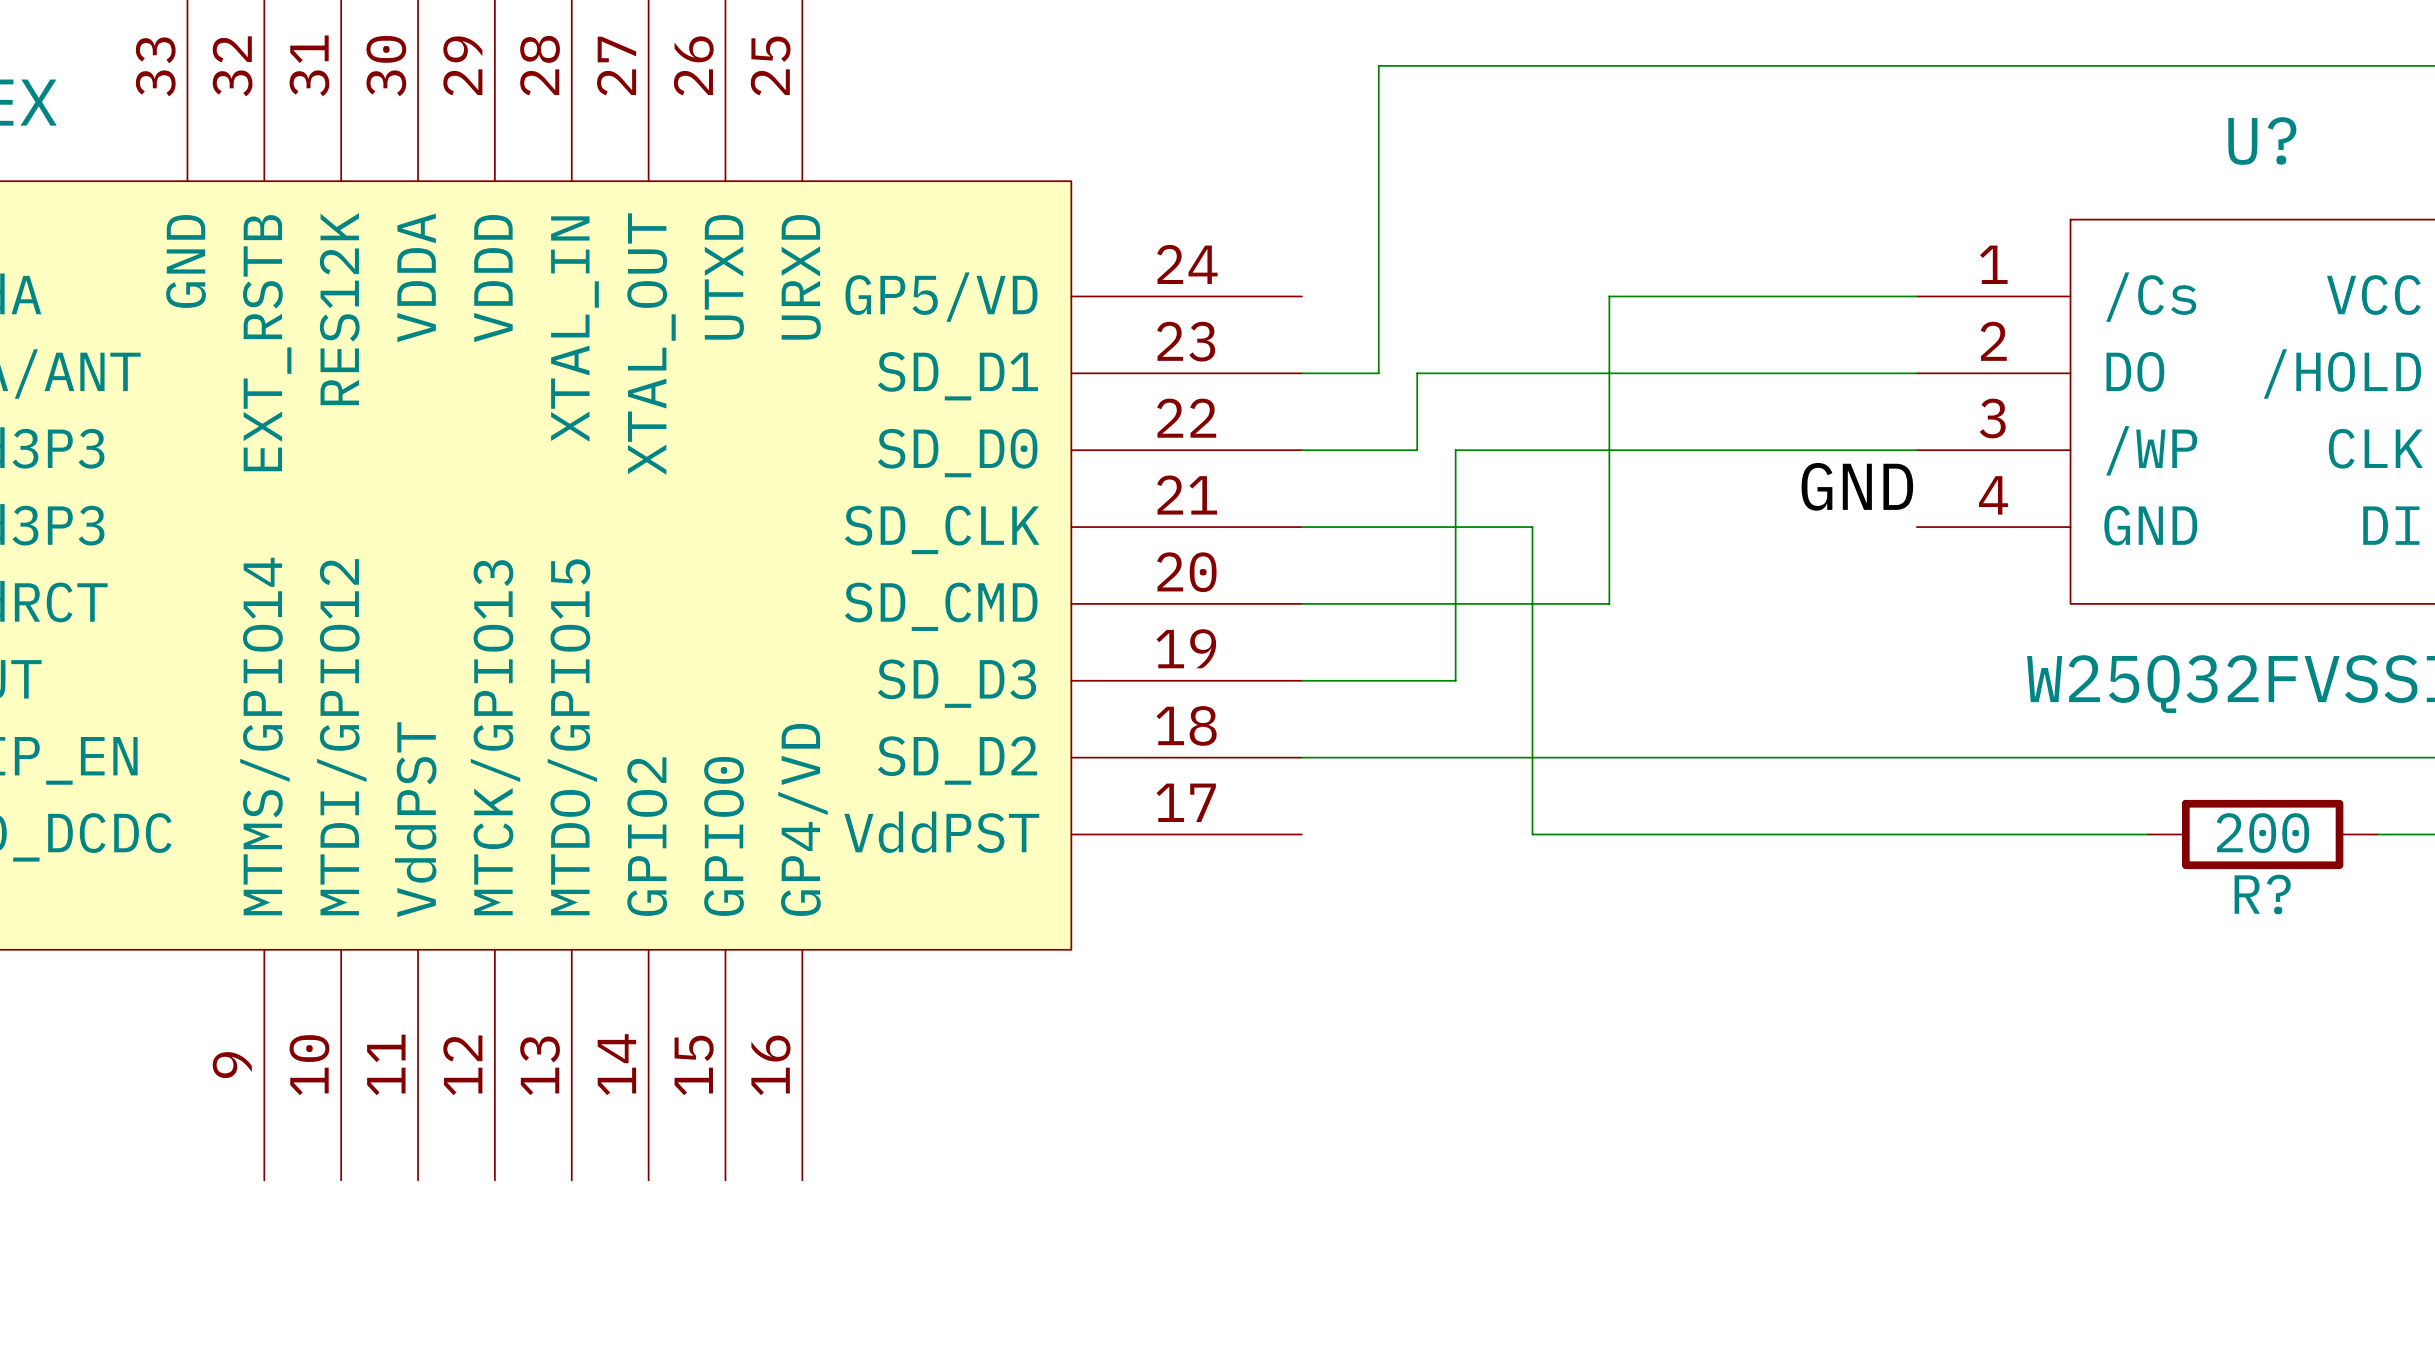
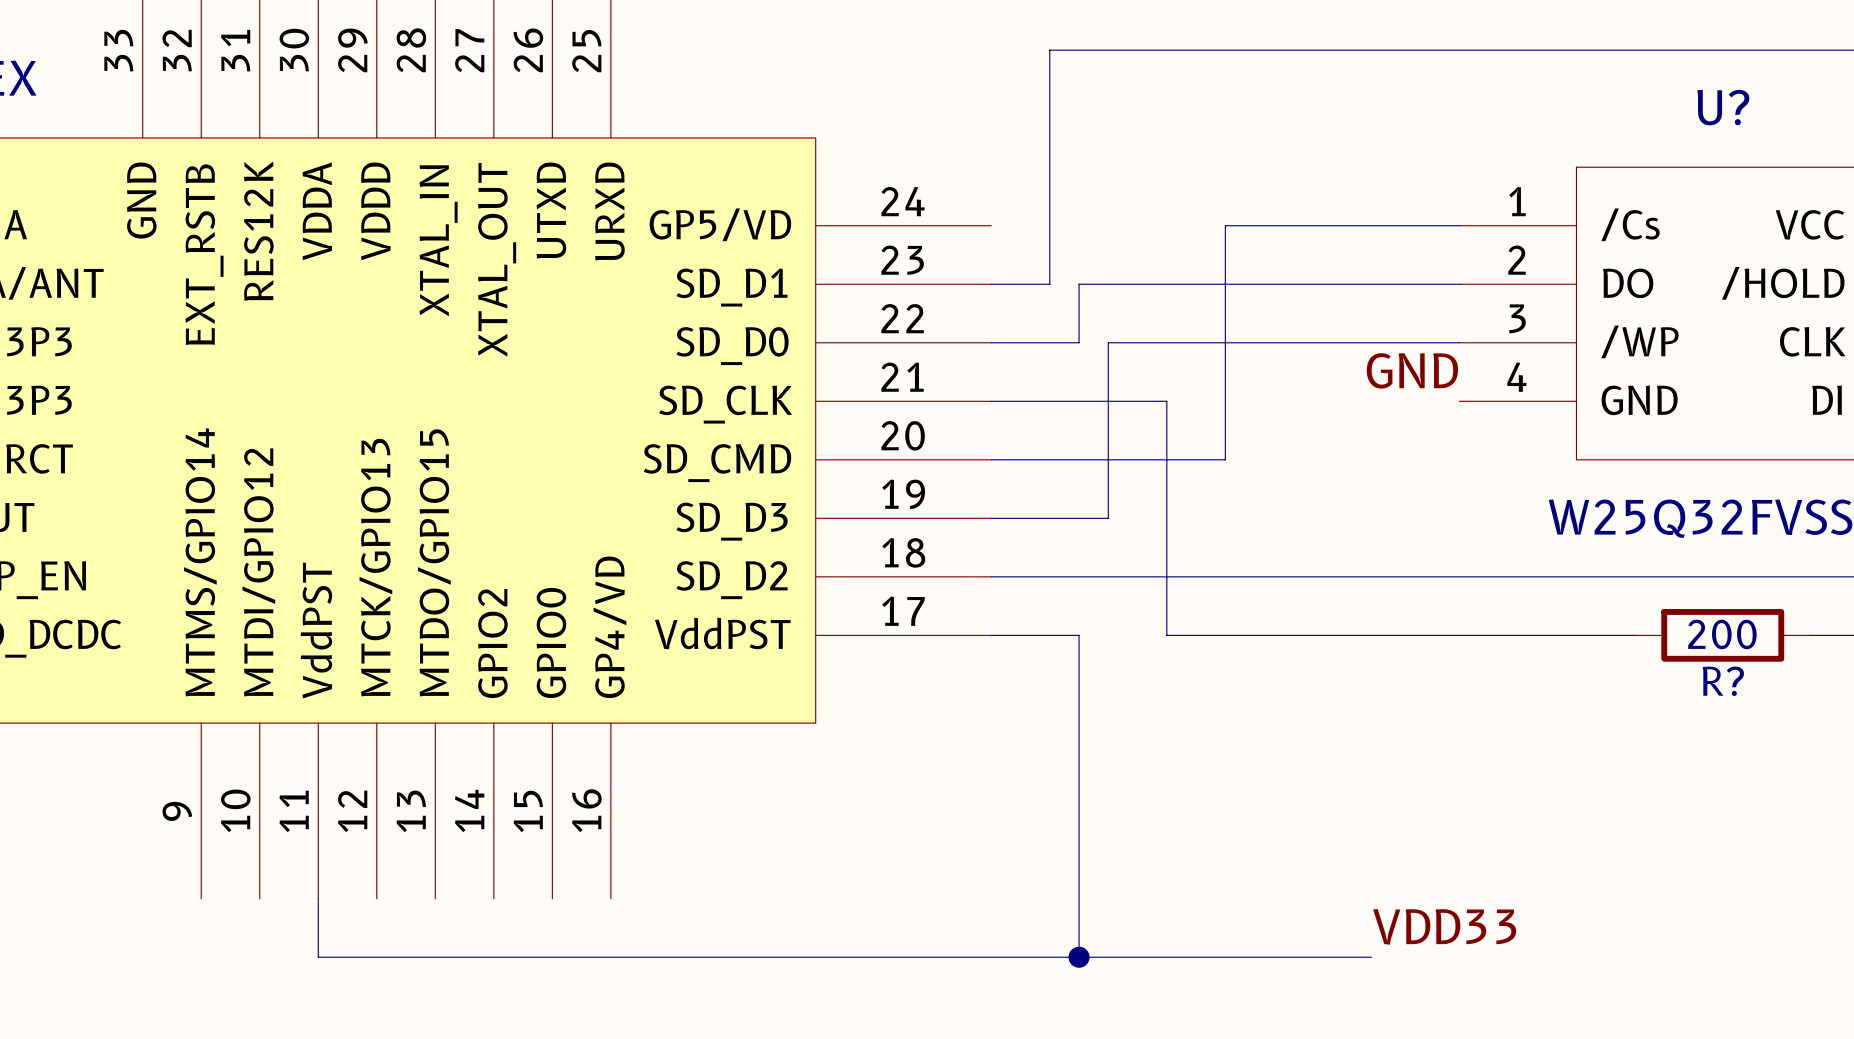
wire: none -> (991, 635) (1079, 635) (1079, 957)
wire: none -> (318, 898) (318, 957) (1371, 957)
label: none -> VDD33 (1444, 926)
junction: none -> (1079, 957)

